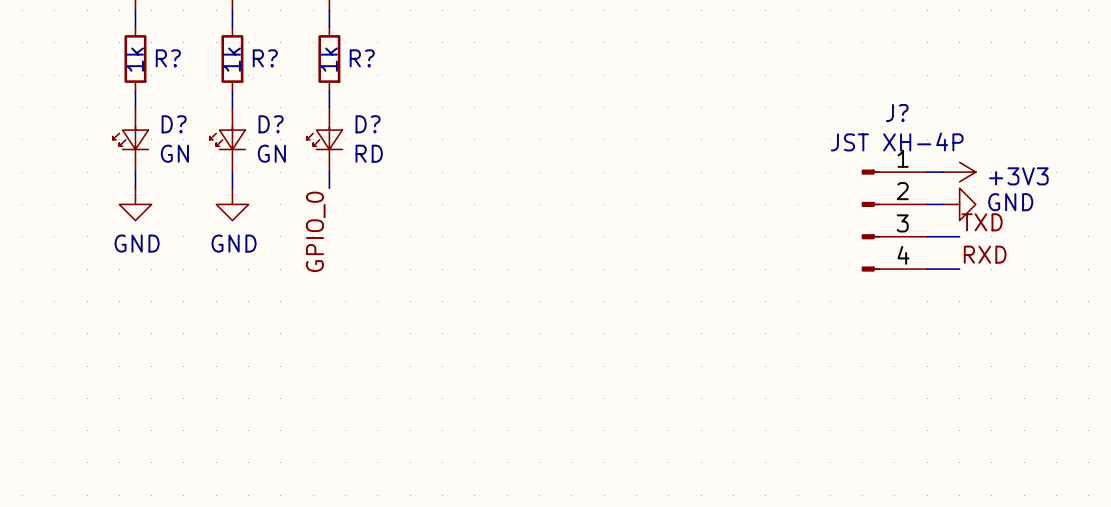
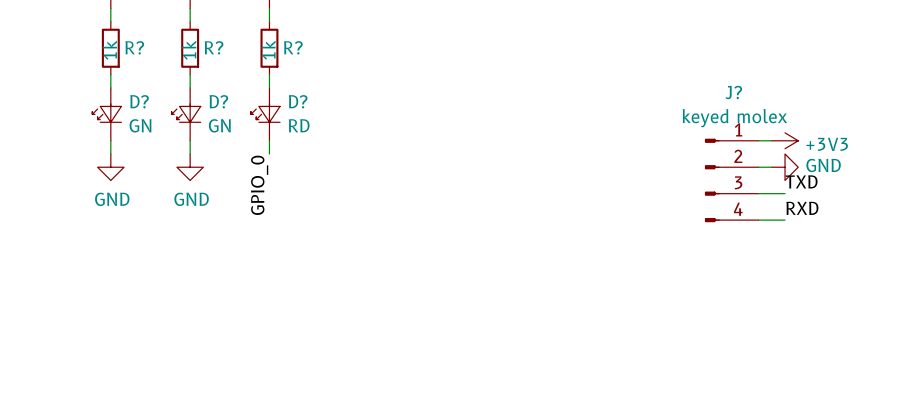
J? value: JST XH-4P (897, 142) -> keyed molex (734, 118)

